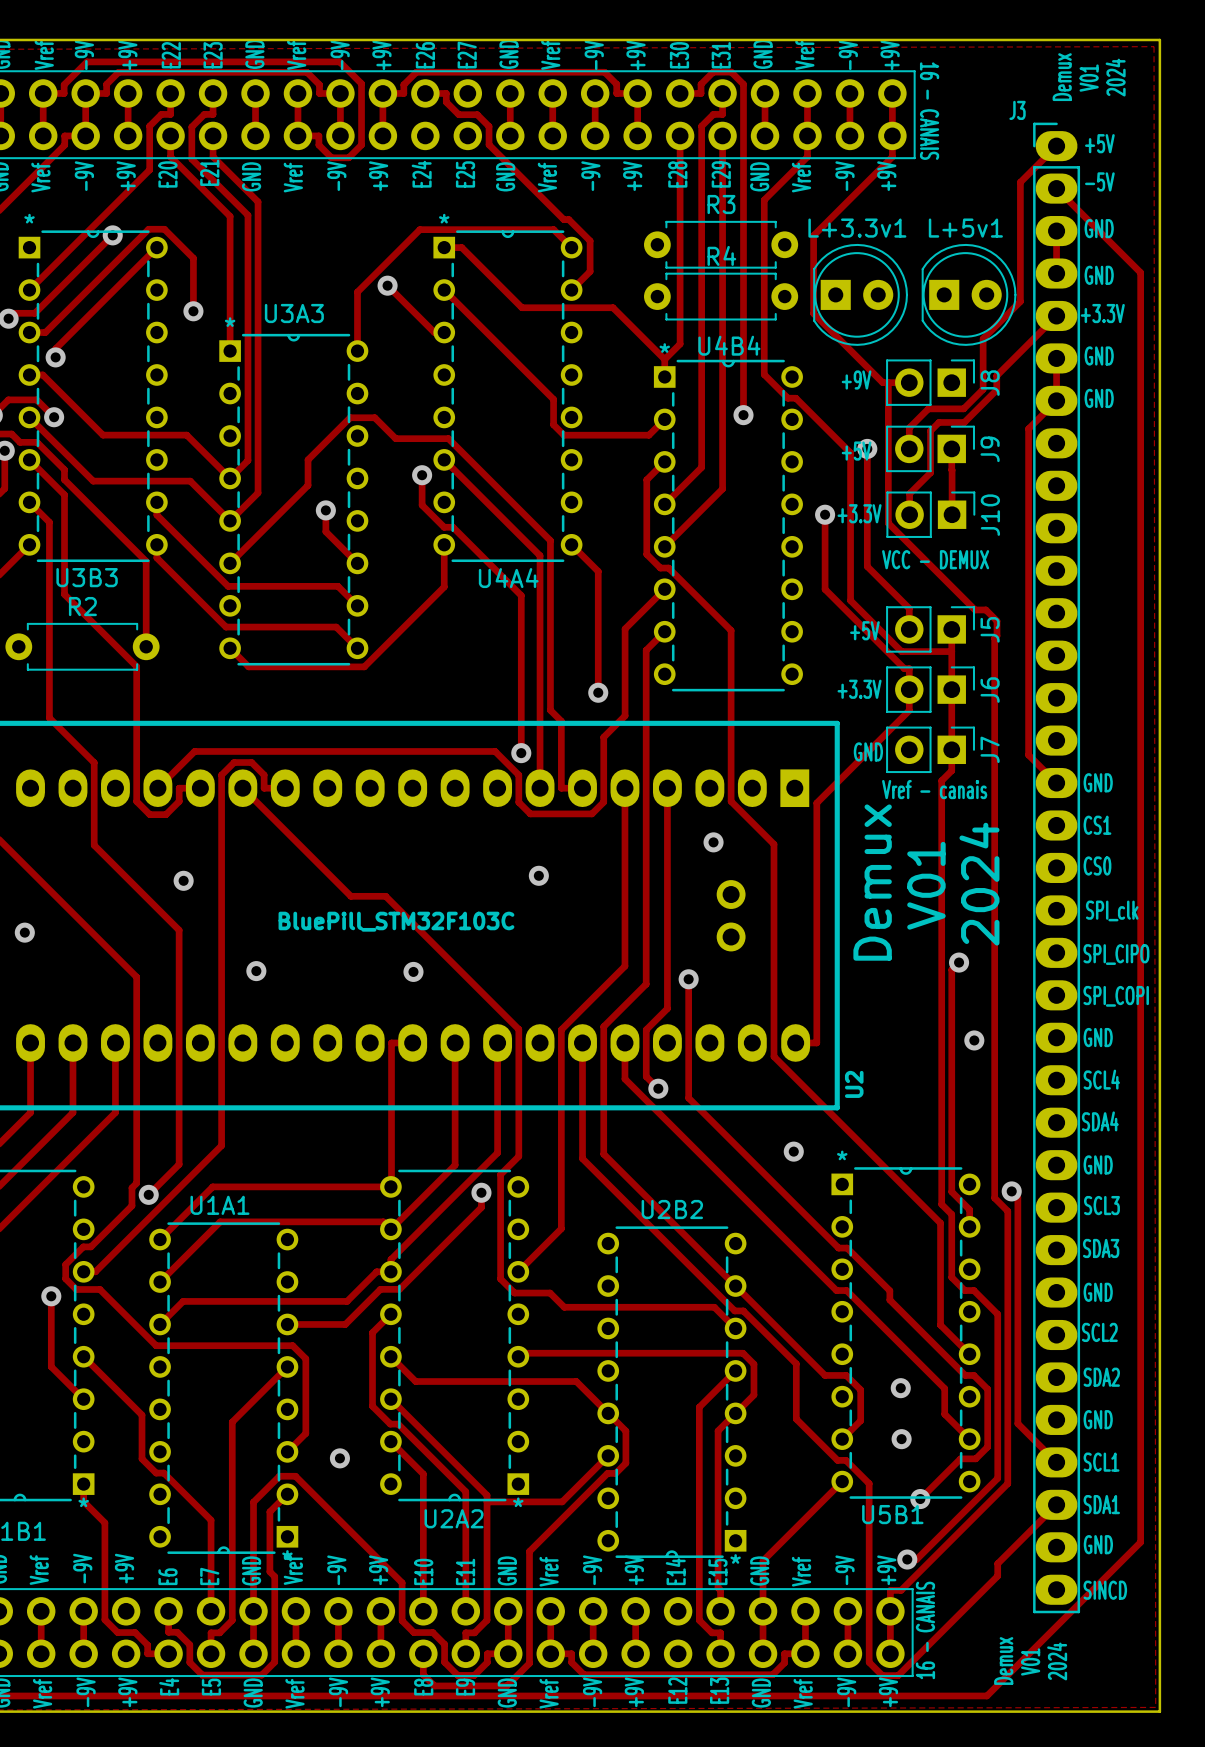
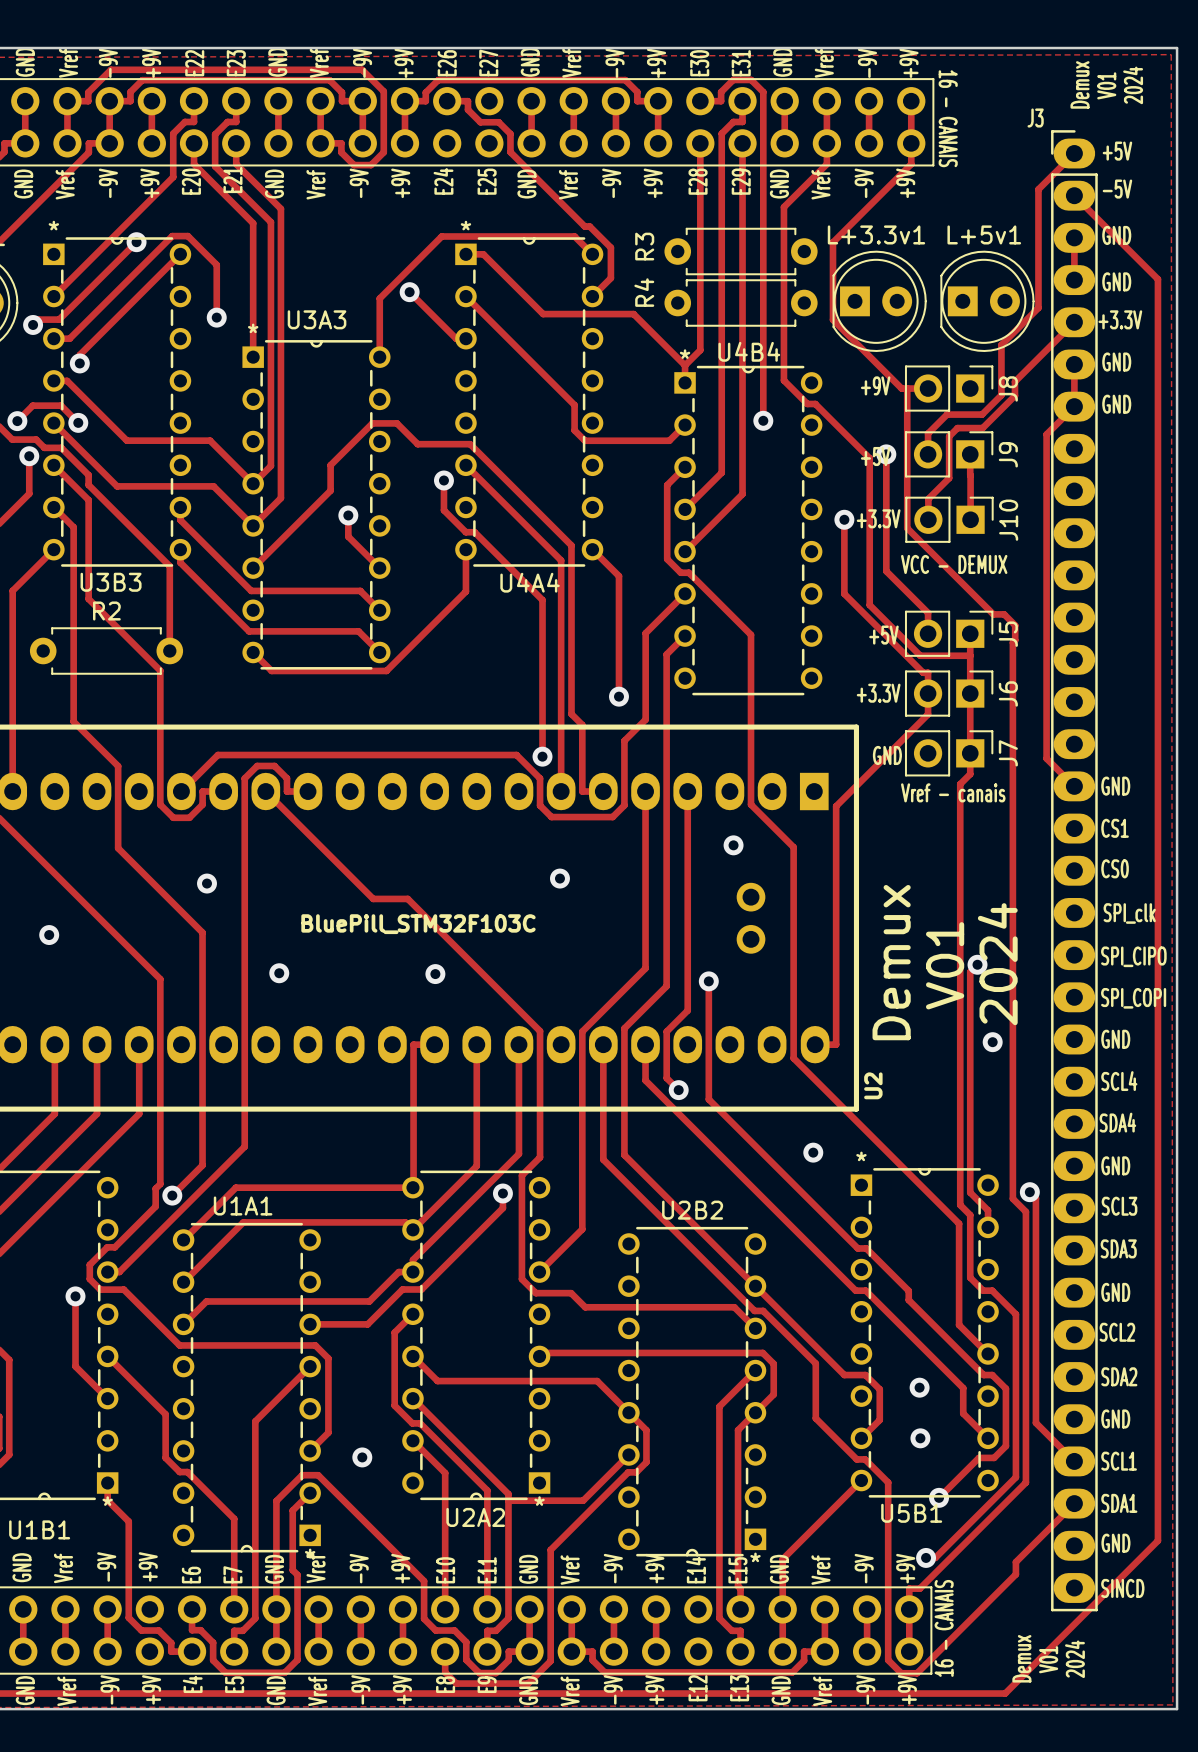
R3 name rotation: 0° (721, 204) -> 90° counterclockwise (644, 246)
R3 name position: R3 (721, 204) -> R3 (644, 246)
R4 name rotation: 0° (721, 255) -> 90° counterclockwise (644, 292)
R4 name position: R4 (721, 255) -> R4 (644, 292)
text position: Demux (872, 882) -> Demux (891, 962)
text position: 2024 (979, 884) -> 2024 (997, 964)
text position: V01 (926, 885) -> V01 (945, 965)

